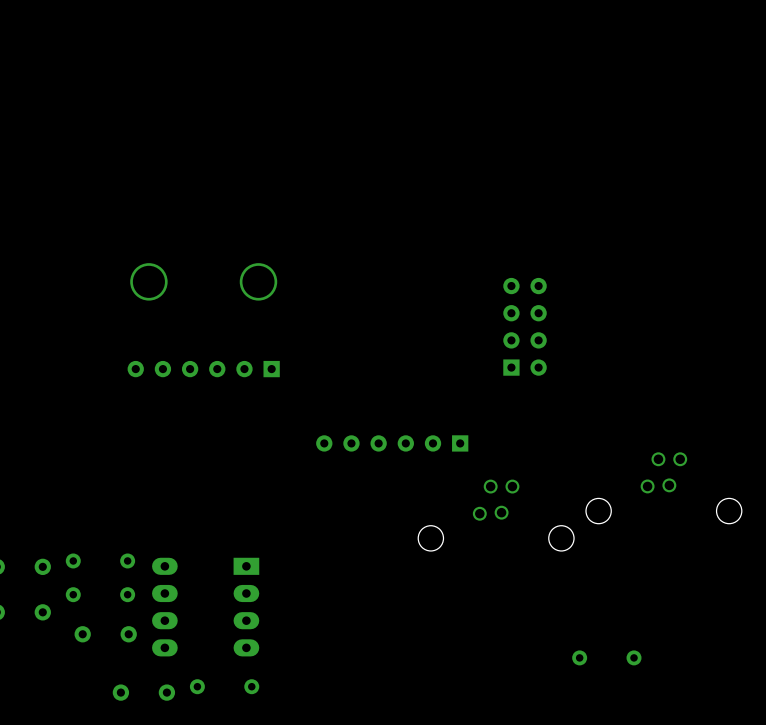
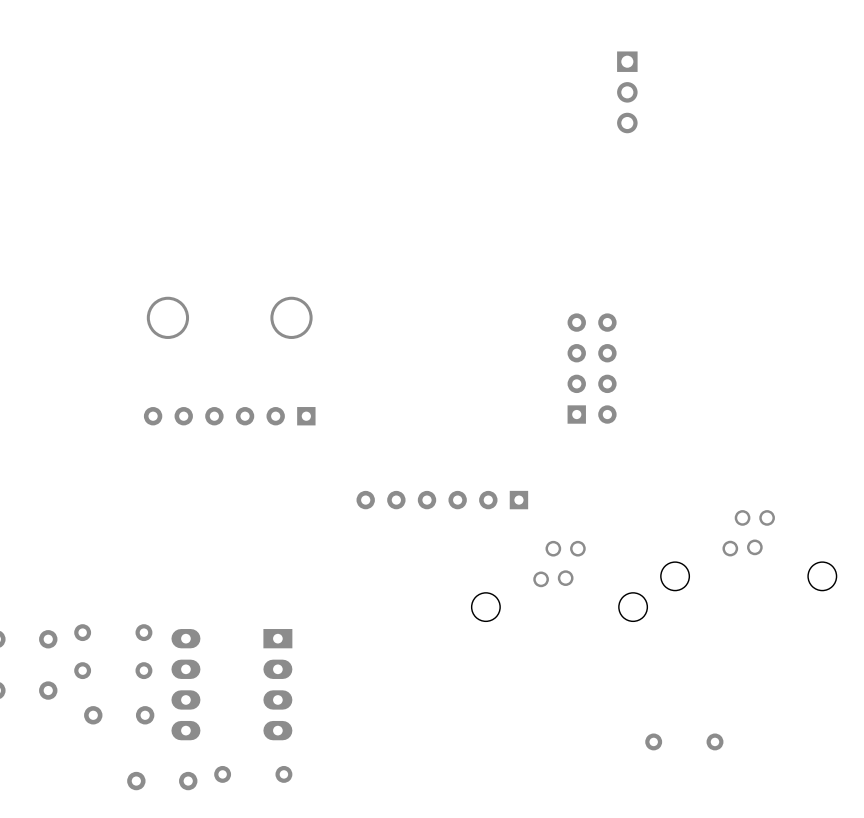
part: none -> (627, 92)

